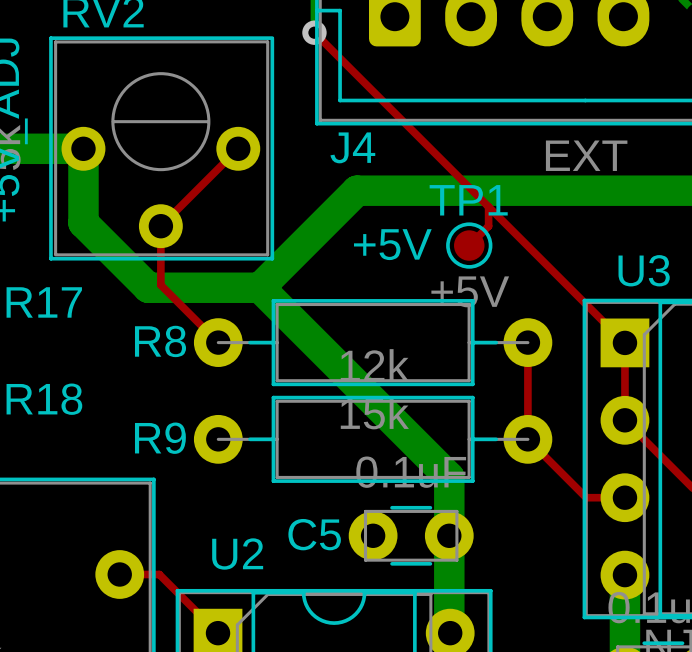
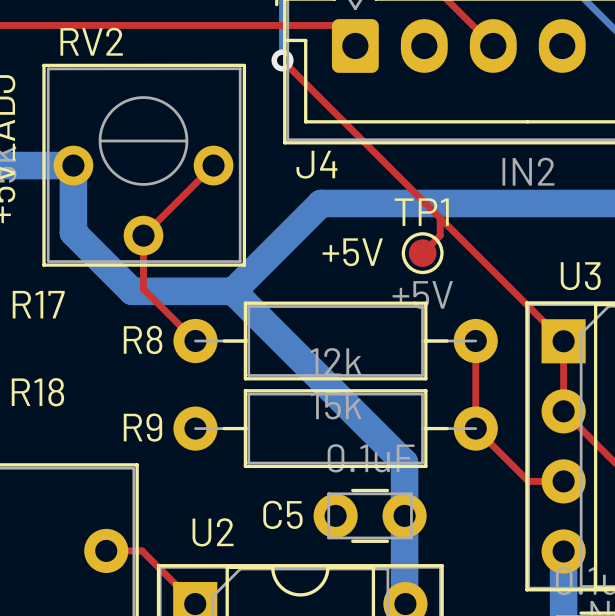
J4 value: EXT (586, 155) -> IN2 (528, 171)

